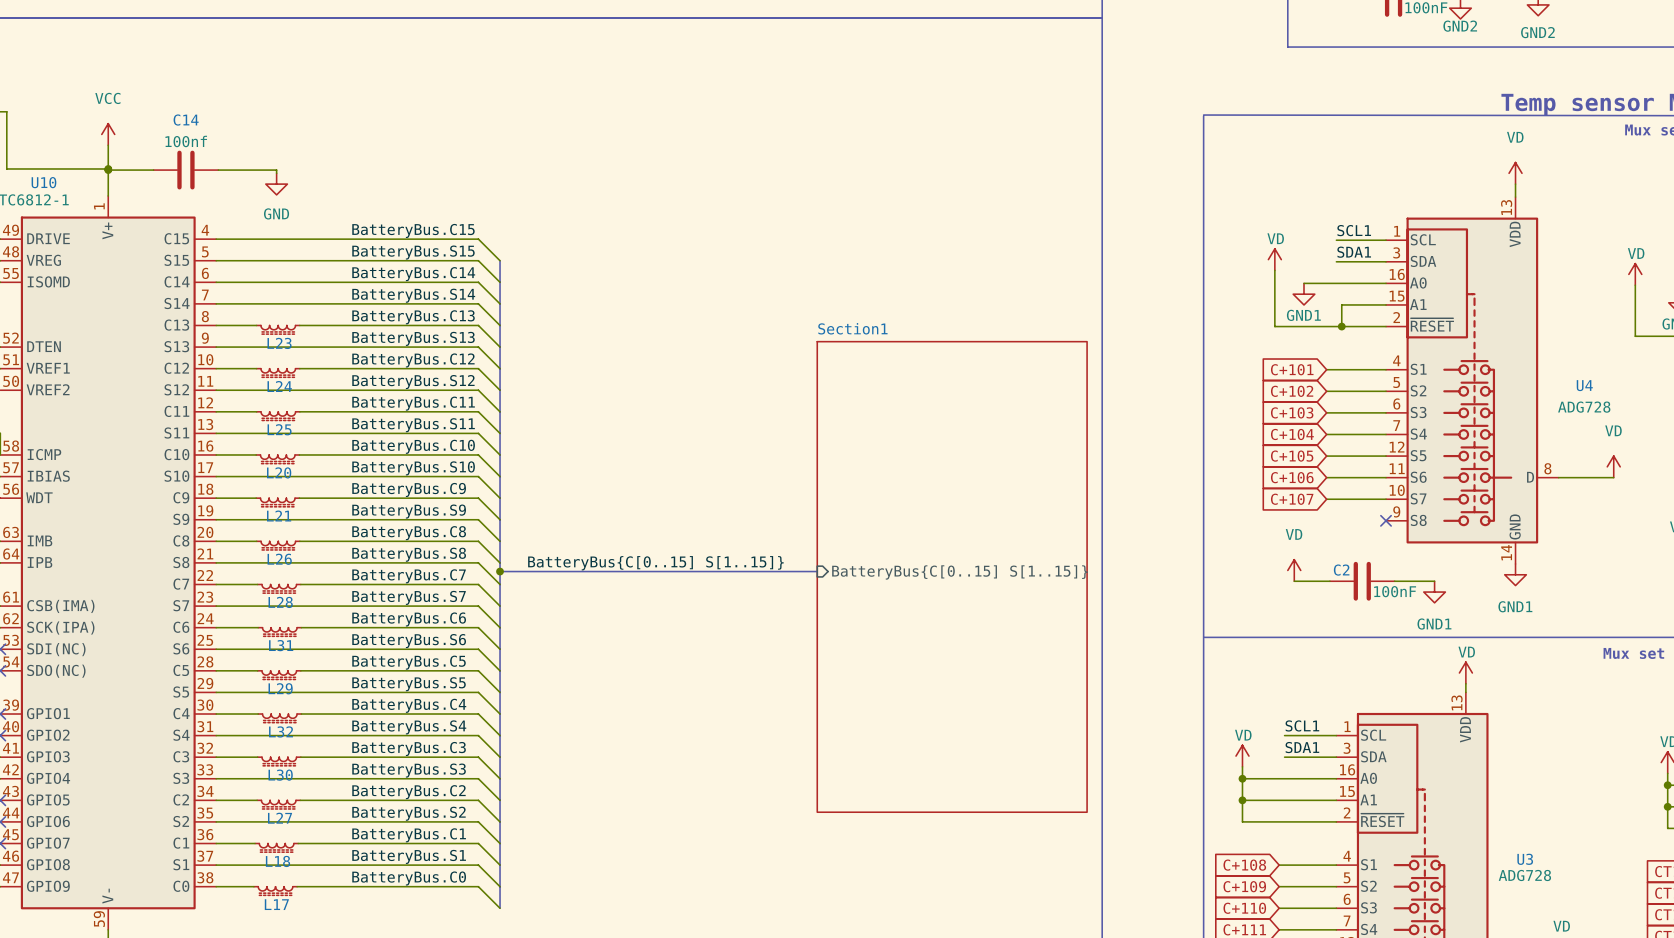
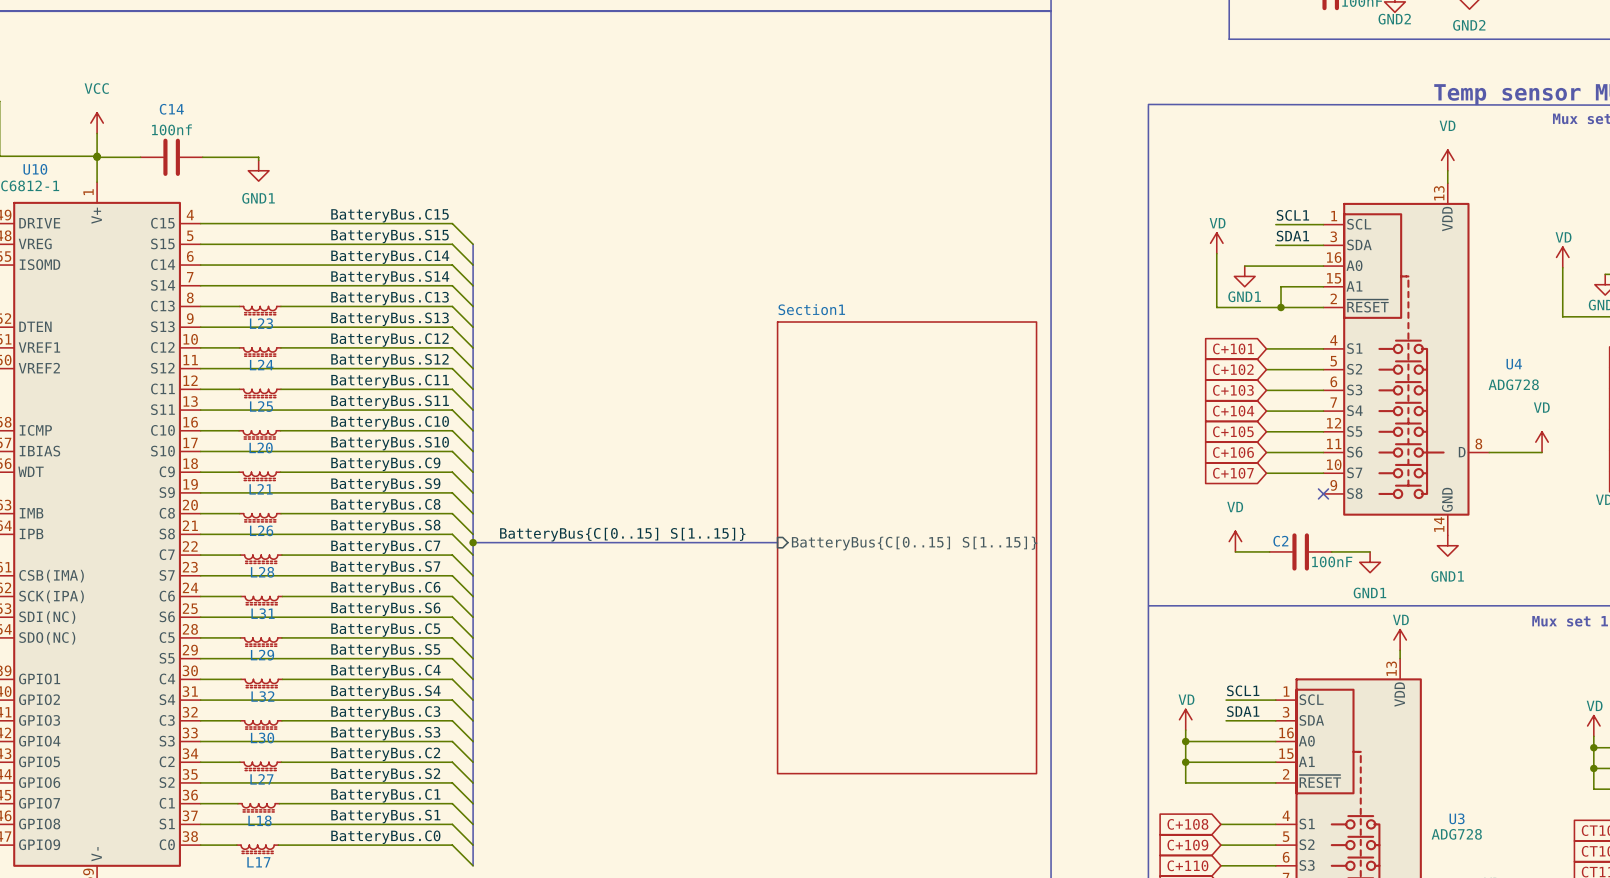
power symbol: GND (276, 184) -> GND1 (258, 170)

